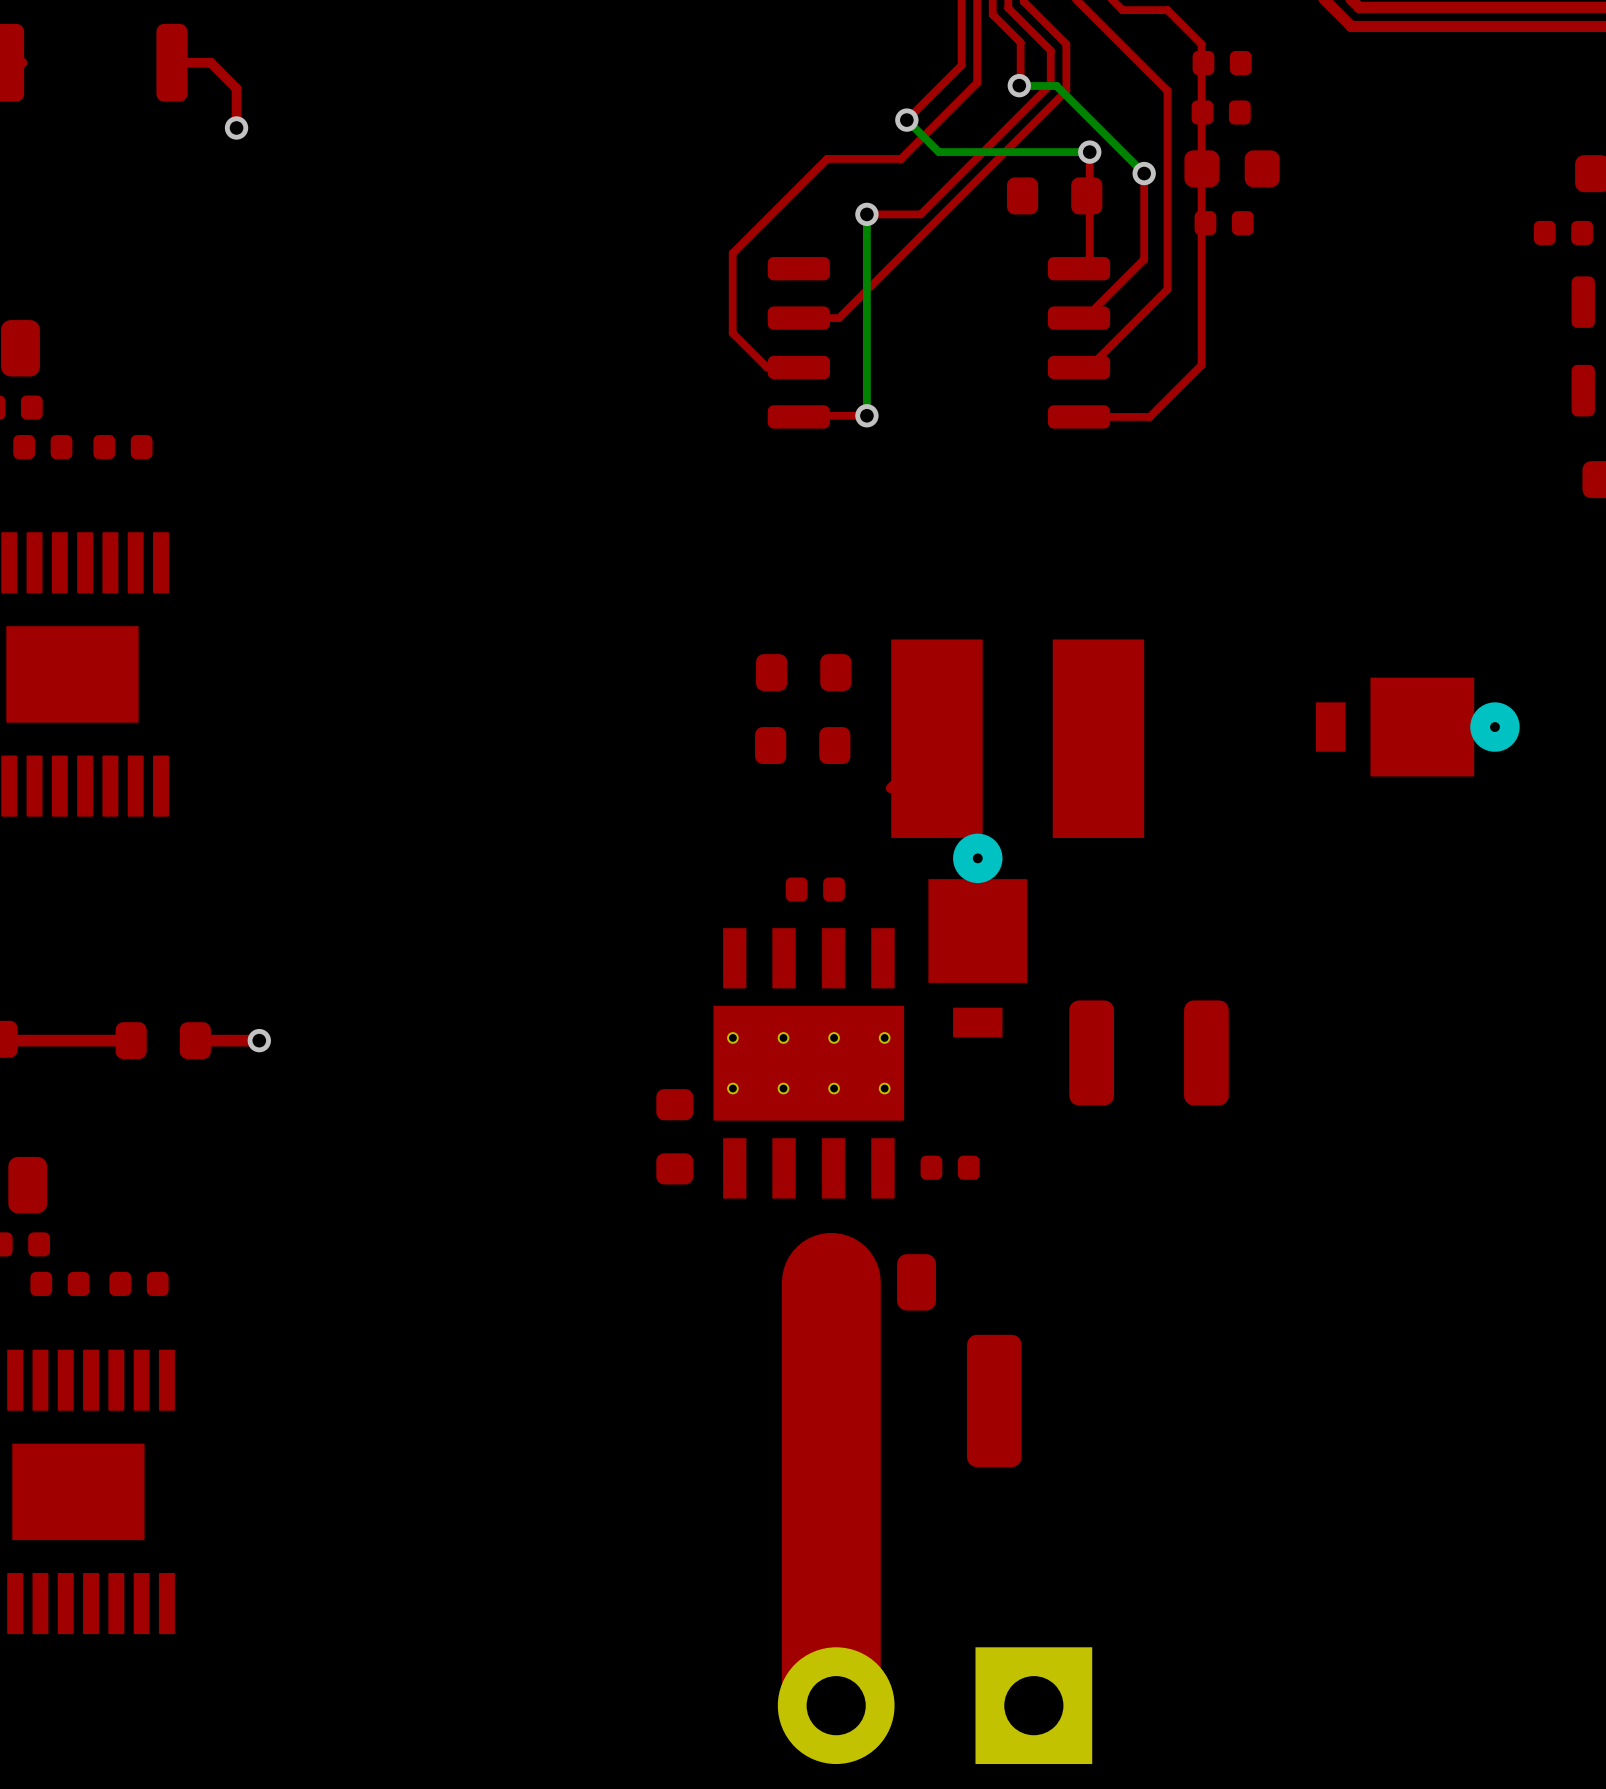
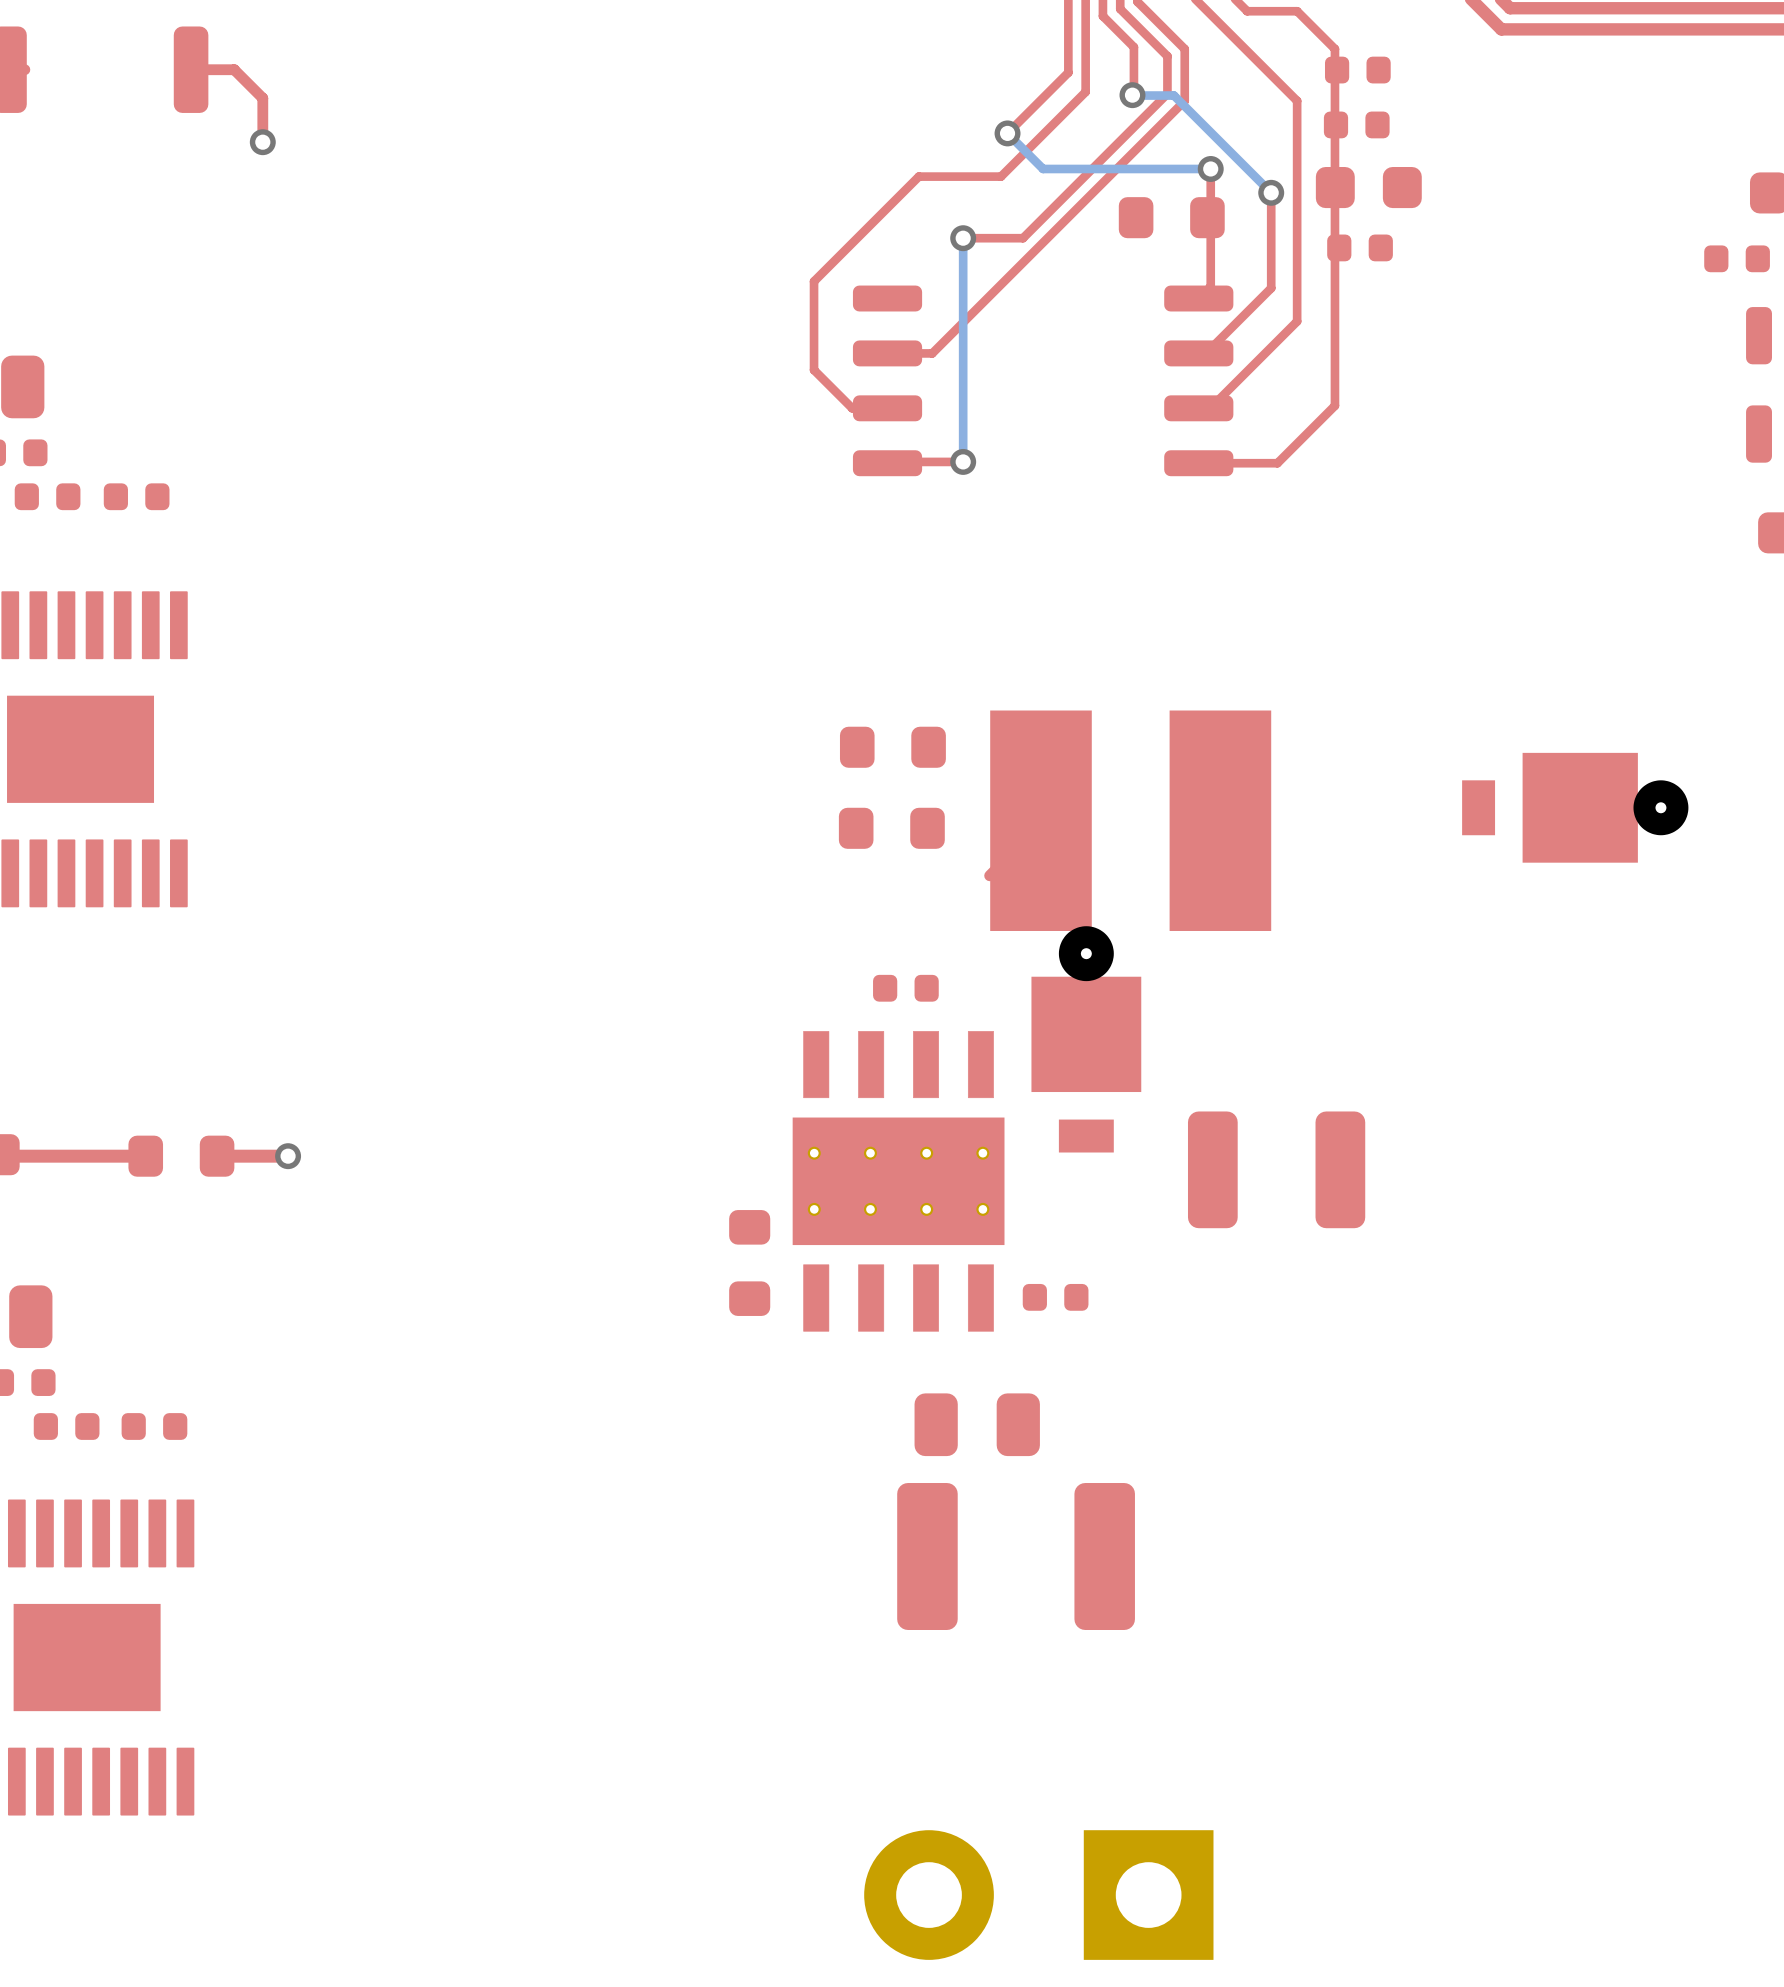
top track: (831, 1282) (831, 1700) -> none

